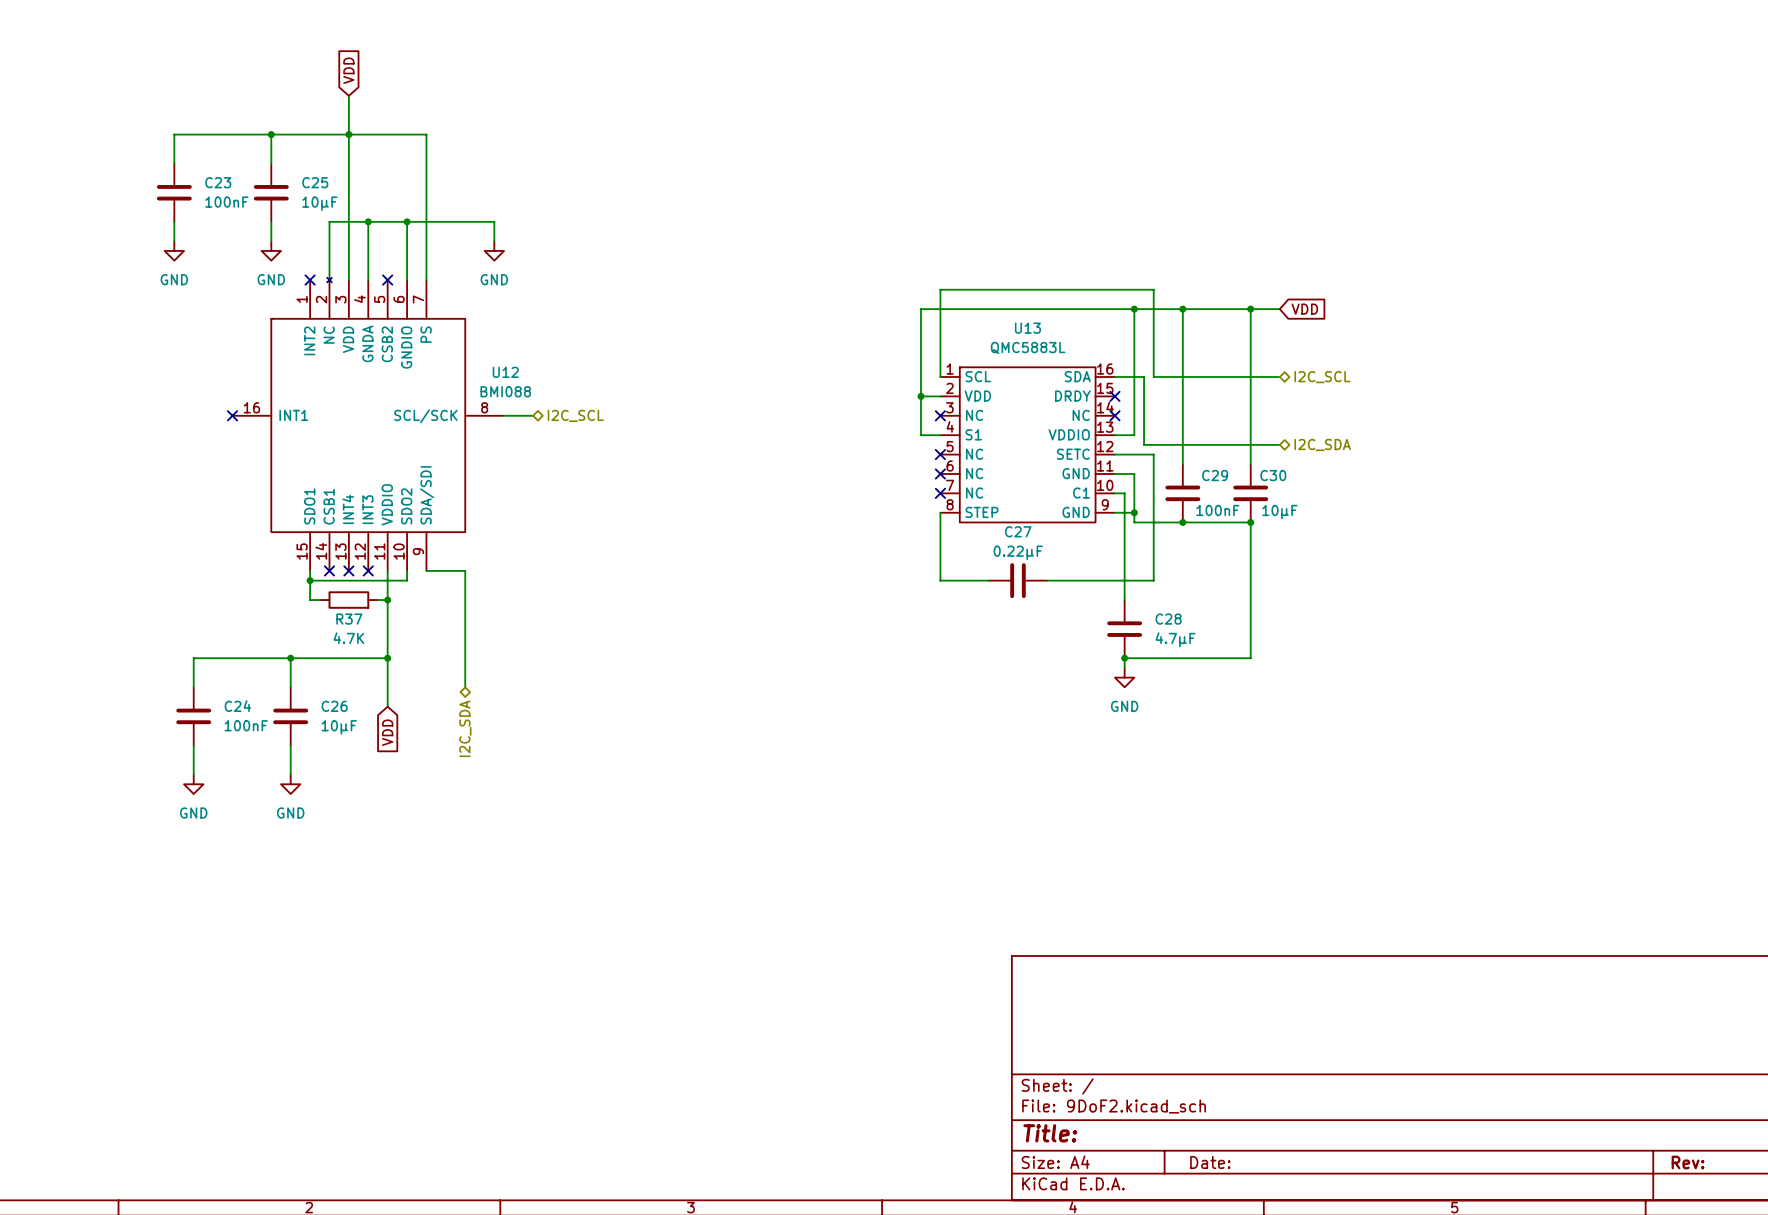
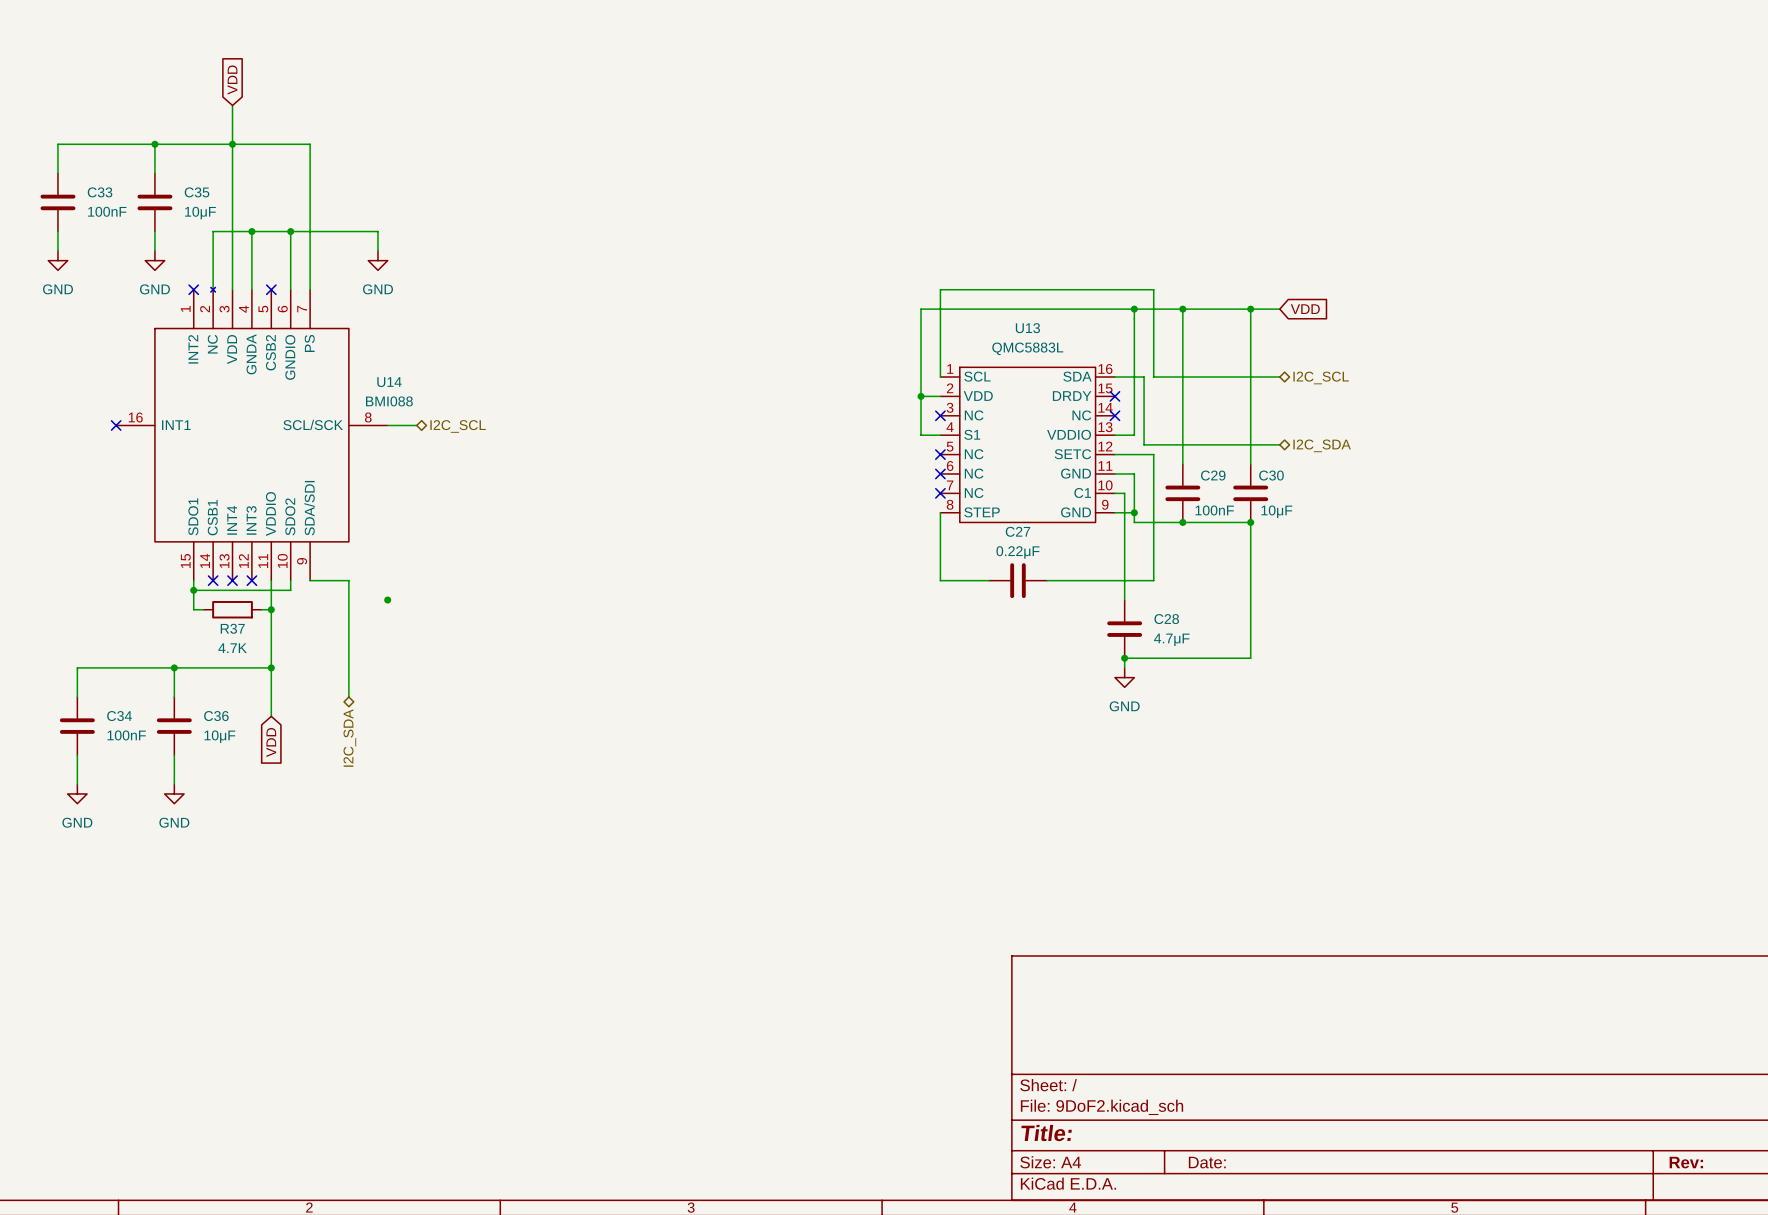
global label position: VDD (348, 70) -> VDD (232, 80)
wire: (348, 95) (348, 280) -> (232, 105) (232, 289)
wire: (271, 134) (271, 163) -> (154, 144) (154, 173)
junction position: (271, 134) -> (232, 144)
junction: (348, 134) -> none
junction: none -> (154, 144)
wire: (174, 163) (174, 134) (426, 134) (426, 280) -> (57, 173) (57, 144) (310, 144) (310, 289)
C23: 100nF (174, 192) -> none
C25: 10μF (271, 192) -> none
C33: none -> 100nF (57, 202)
C35: none -> 10μF (154, 202)
wire: (174, 221) (174, 241) -> (57, 231) (57, 250)
wire: (271, 221) (271, 241) -> (154, 231) (154, 250)
wire: (368, 221) (368, 280) -> (251, 231) (251, 289)
junction: (368, 221) -> none
wire: (407, 221) (407, 280) -> (290, 231) (290, 289)
junction: (407, 221) -> none
junction: none -> (251, 231)
junction: none -> (290, 231)
wire: (494, 241) (494, 221) (329, 221) (329, 280) -> (377, 250) (377, 231) (213, 231) (213, 289)
power symbol position: GND (174, 250) -> GND (154, 260)
power symbol: GND (271, 250) -> none
power symbol: GND (494, 250) -> none
power symbol: none -> GND (57, 260)
power symbol: none -> GND (377, 260)
no-connect mark position: (310, 280) -> (271, 289)
no-connect mark: (387, 280) -> none
no-connect mark: none -> (193, 289)
no-connect mark: (232, 415) -> none
wire: (504, 415) (533, 415) -> (387, 425) (416, 425)
hierarchical label position: I2C_SCL (575, 415) -> I2C_SCL (458, 426)
U12: BMI088 (368, 424) -> none
no-connect mark: none -> (116, 425)
U14: none -> BMI088 (251, 434)
wire: (310, 570) (310, 600) (319, 600) -> (193, 580) (193, 609) (203, 609)
no-connect mark: (329, 570) -> none
no-connect mark: (348, 570) -> none
no-connect mark: (368, 570) -> none
wire: (387, 570) (387, 706) -> (271, 580) (271, 716)
wire: (407, 570) (407, 580) (348, 580) -> (348, 697) (348, 580)
wire: (426, 570) (465, 570) (465, 687) -> none
no-connect mark: none -> (213, 580)
no-connect mark: none -> (232, 580)
no-connect mark: none -> (251, 580)
wire: none -> (290, 580) (290, 590) (193, 590)
junction: (310, 580) -> none
junction: none -> (193, 590)
R37 position: (348, 600) -> (232, 609)
wire: (377, 600) (387, 600) -> (261, 609) (271, 609)
junction: none -> (271, 609)
wire: (290, 658) (290, 687) -> (174, 667) (174, 697)
junction position: (290, 658) -> (271, 667)
wire: (387, 658) (193, 658) (193, 687) -> (271, 667) (77, 667) (77, 697)
junction: (387, 658) -> none
junction: none -> (174, 667)
C24: 100nF (193, 716) -> none
C26: 10μF (290, 716) -> none
C34: none -> 100nF (77, 726)
C36: none -> 10μF (174, 726)
hierarchical label position: I2C_SDA (465, 728) -> I2C_SDA (349, 738)
global label position: VDD (387, 732) -> VDD (271, 742)
wire: (193, 745) (193, 774) -> (77, 755) (77, 784)
wire: (290, 745) (290, 774) -> (174, 755) (174, 784)
power symbol position: GND (193, 784) -> GND (174, 793)
power symbol: GND (290, 784) -> none
power symbol: none -> GND (77, 793)

